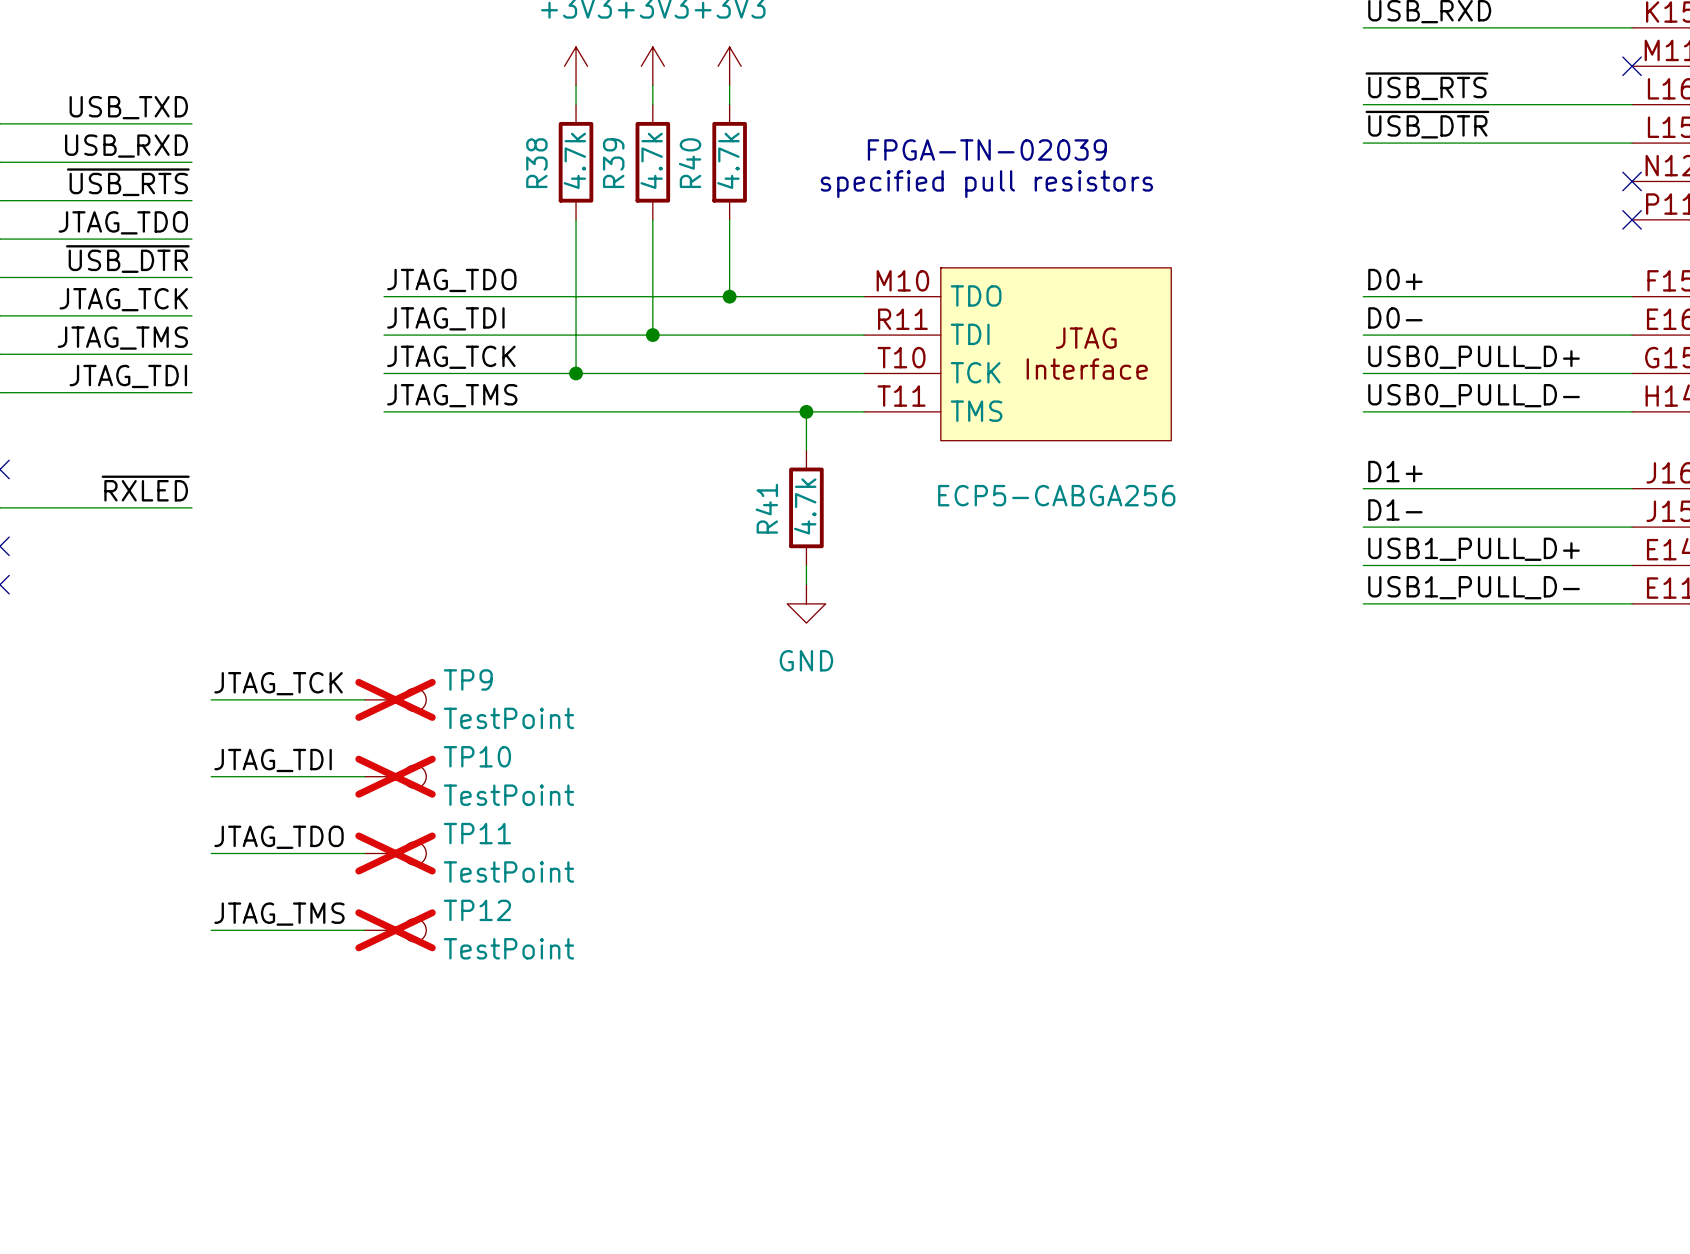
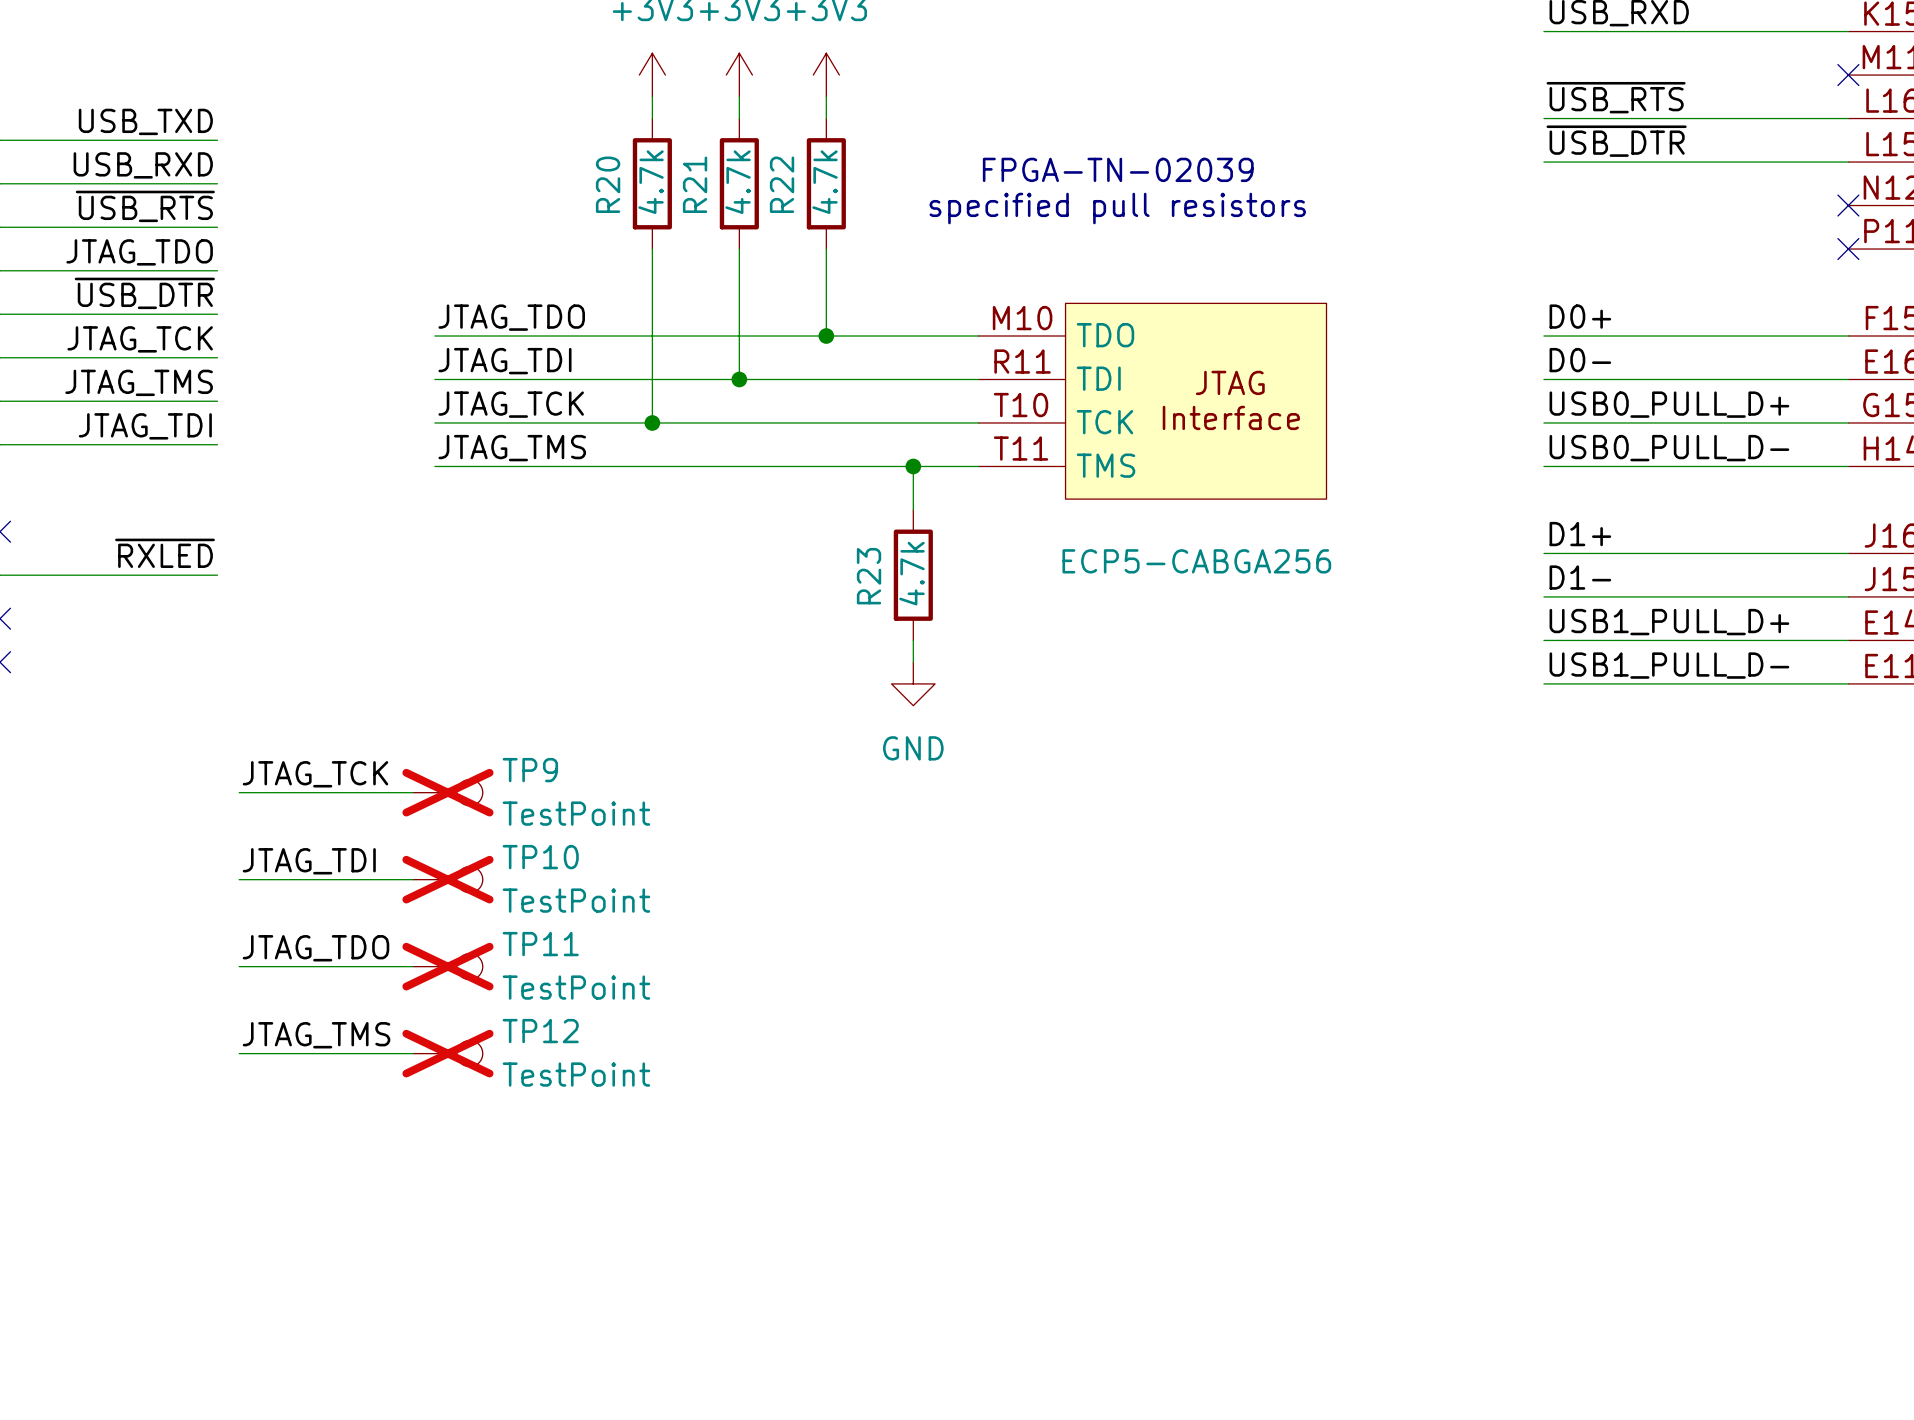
R38 name: R38 (536, 163) -> R20 (608, 184)
R39 name: R39 (613, 163) -> R21 (695, 184)
R40 name: R40 (690, 163) -> R22 (782, 184)
R41 name: R41 (766, 508) -> R23 (869, 576)

